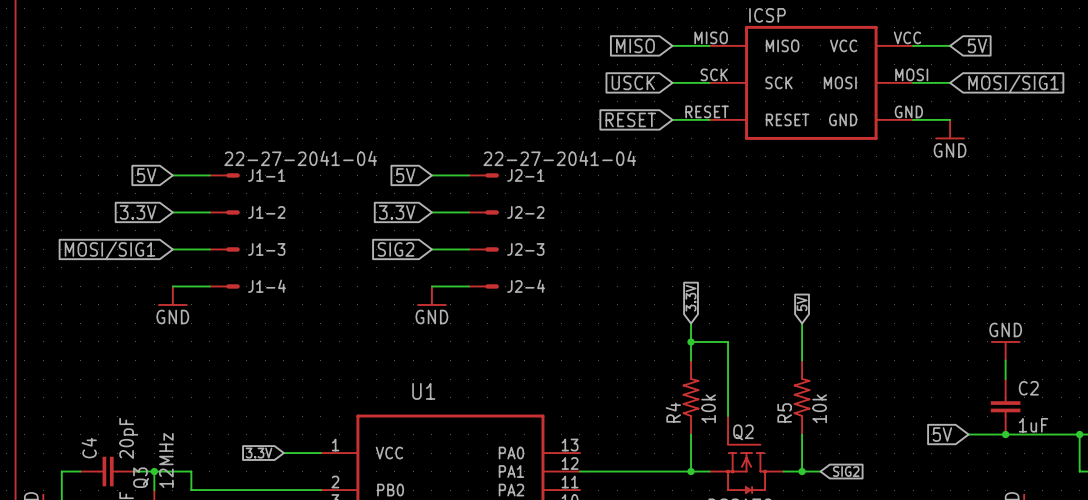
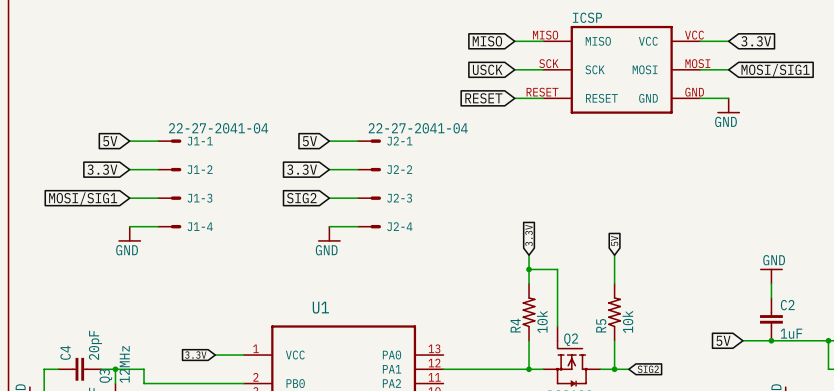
global label: 5V (977, 45) -> 3.3V (756, 41)

